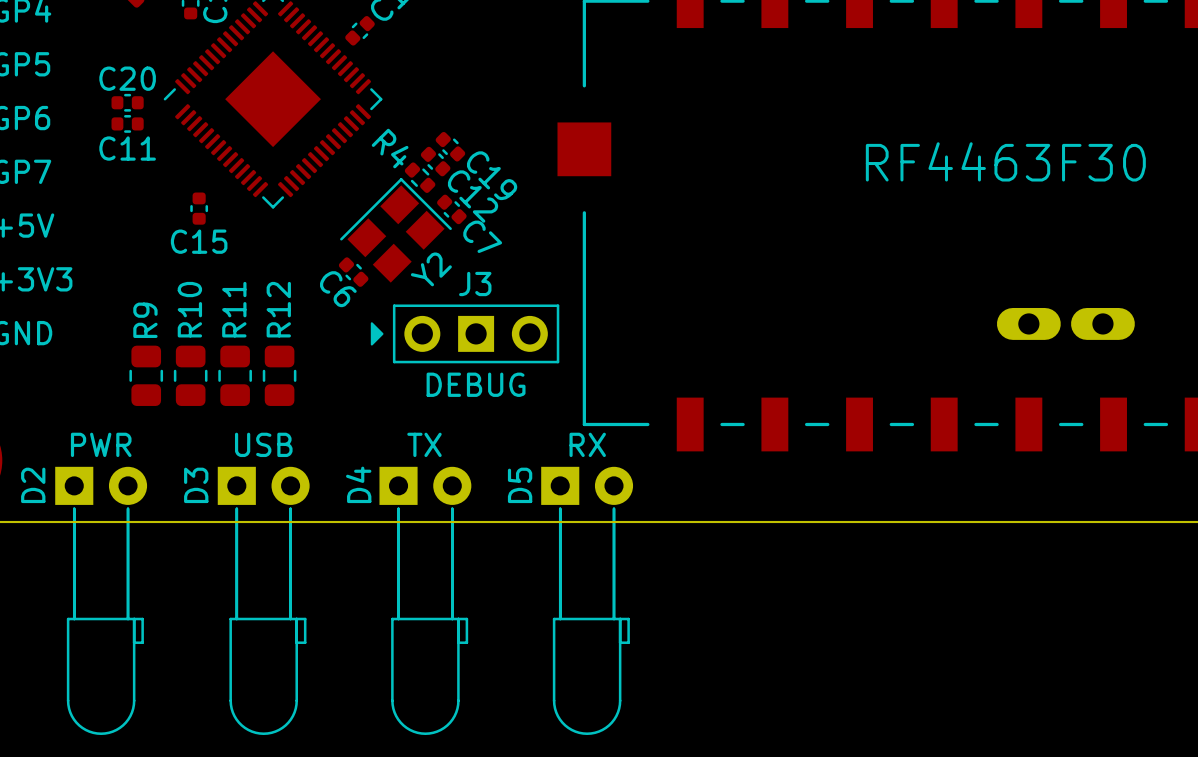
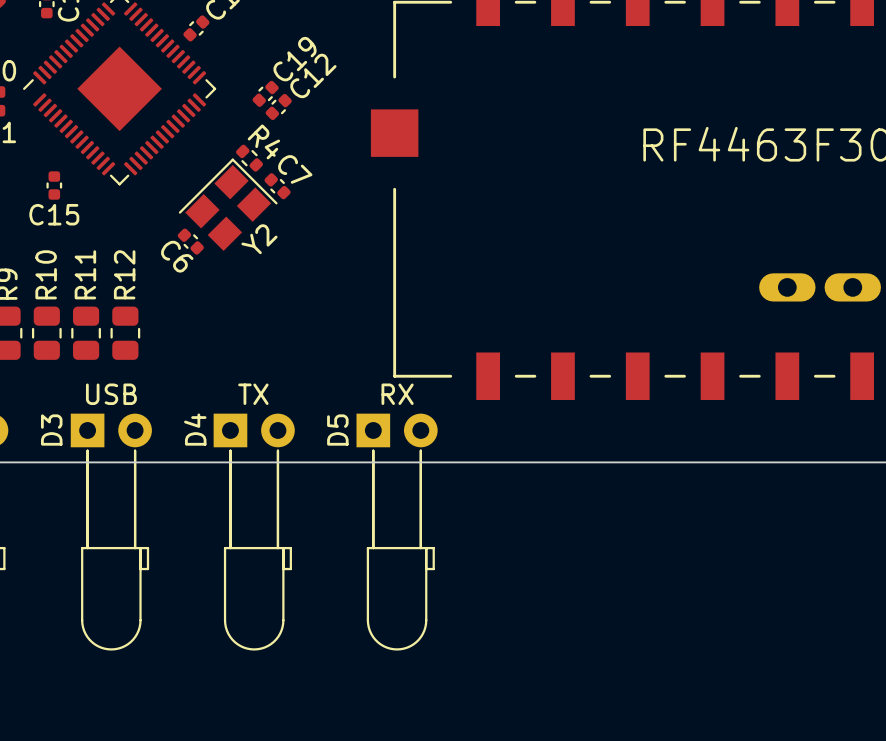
C19 rotation: 0° (450, 146) -> 90° clockwise (265, 93)
C19 position: (450, 146) -> (265, 93)
R4 name position: R4 (390, 148) -> R4 (263, 141)
C12 rotation: 0° (435, 161) -> 90° clockwise (278, 106)
C12 position: (435, 161) -> (278, 106)
C19 name position: C19 (492, 175) -> C19 (295, 59)
C12 name position: C12 (473, 196) -> C12 (313, 75)
C7 name position: C7 (482, 236) -> C7 (295, 169)
J3: (465, 333) -> none
text: DEBUG (476, 384) -> none

